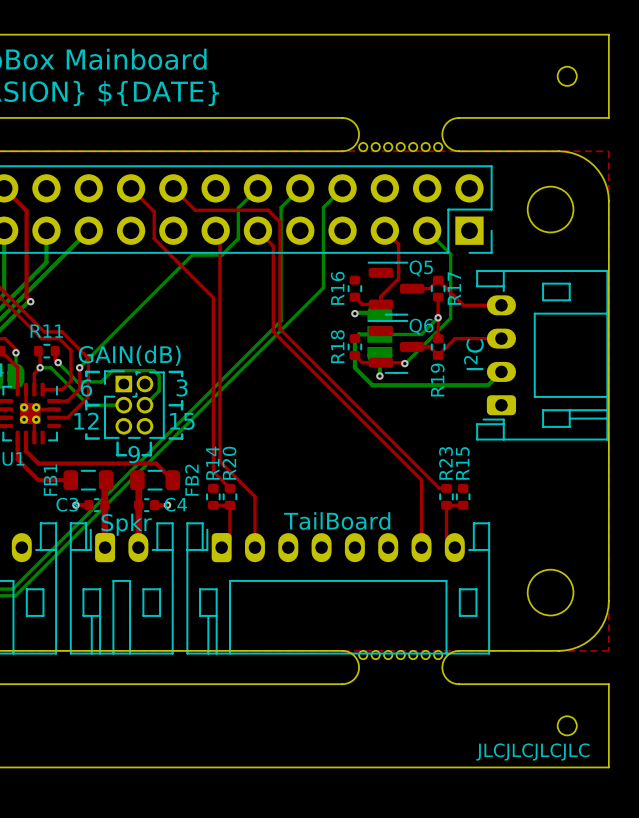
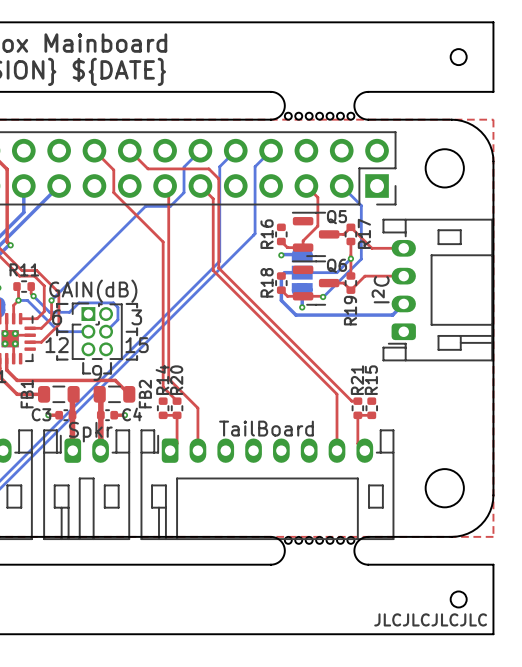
R23 name: R23 (446, 463) -> R21 (357, 380)

